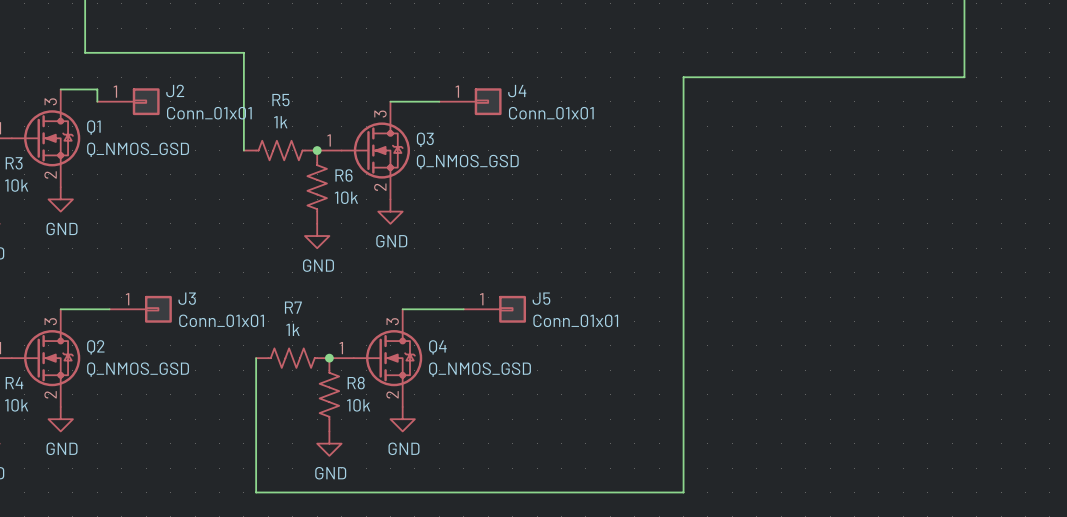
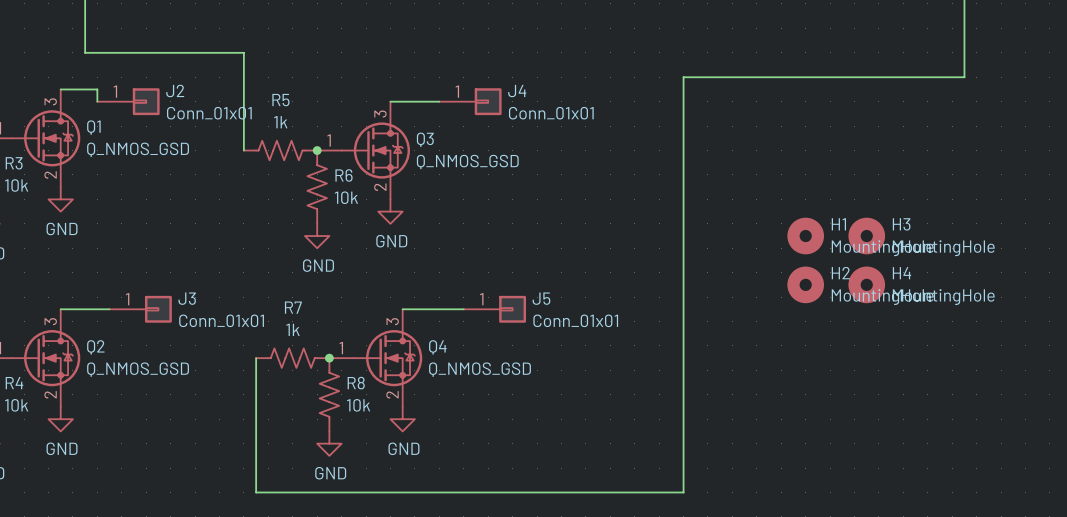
H1: none -> MountingHole (805, 236)
H3: none -> MountingHole (866, 236)
H2: none -> MountingHole (805, 284)
H4: none -> MountingHole (866, 284)

